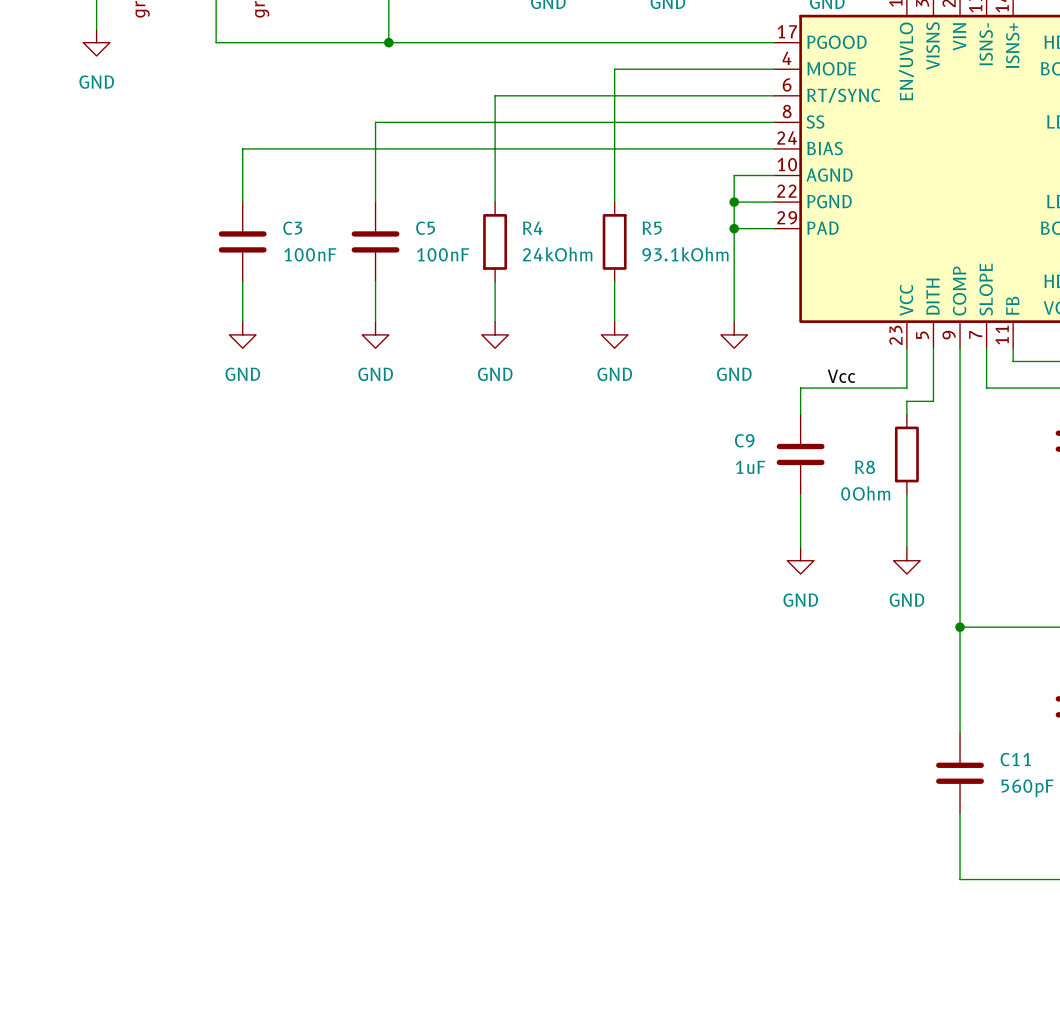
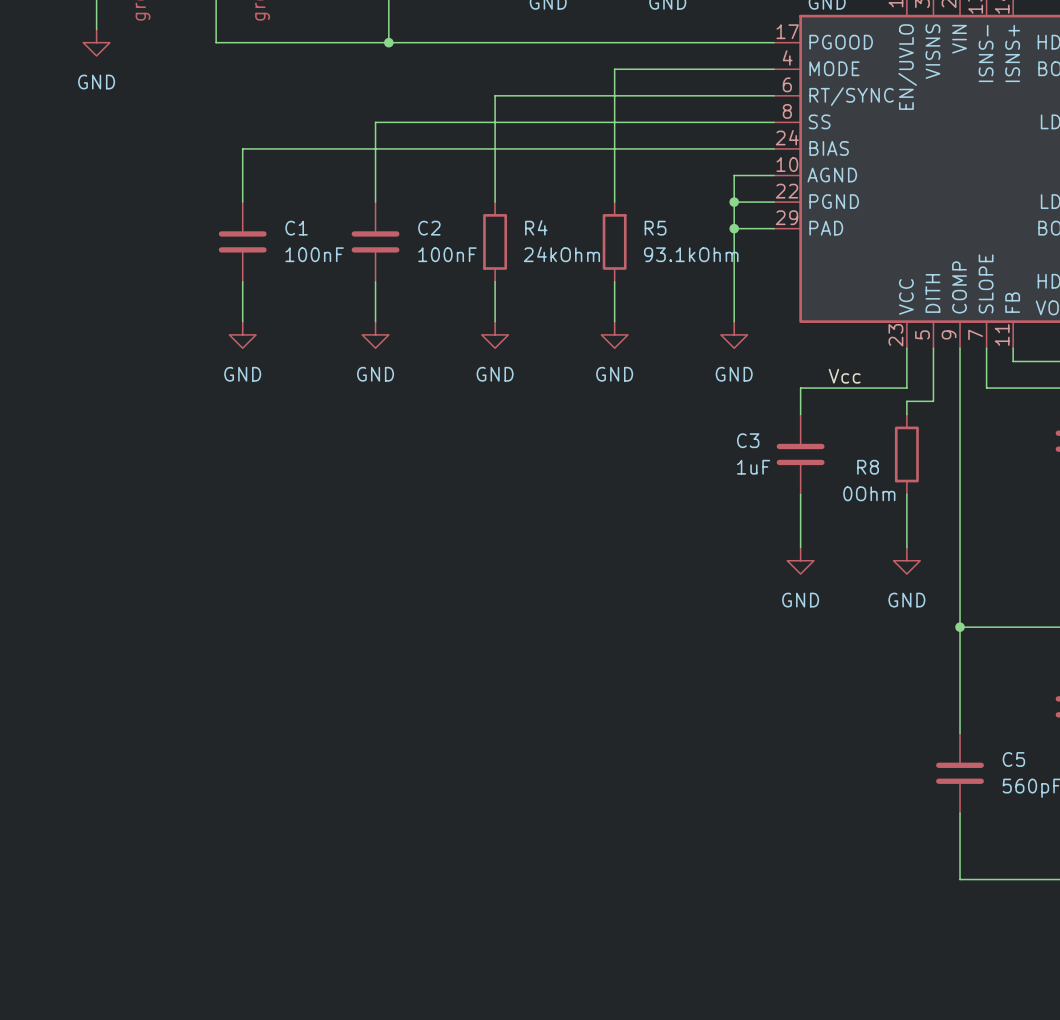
C3 name: C3 (292, 228) -> C1 (296, 228)
C5 name: C5 (425, 228) -> C2 (429, 228)
C9 name: C9 (744, 440) -> C3 (748, 440)
C11 name: C11 (1015, 759) -> C5 (1013, 759)

